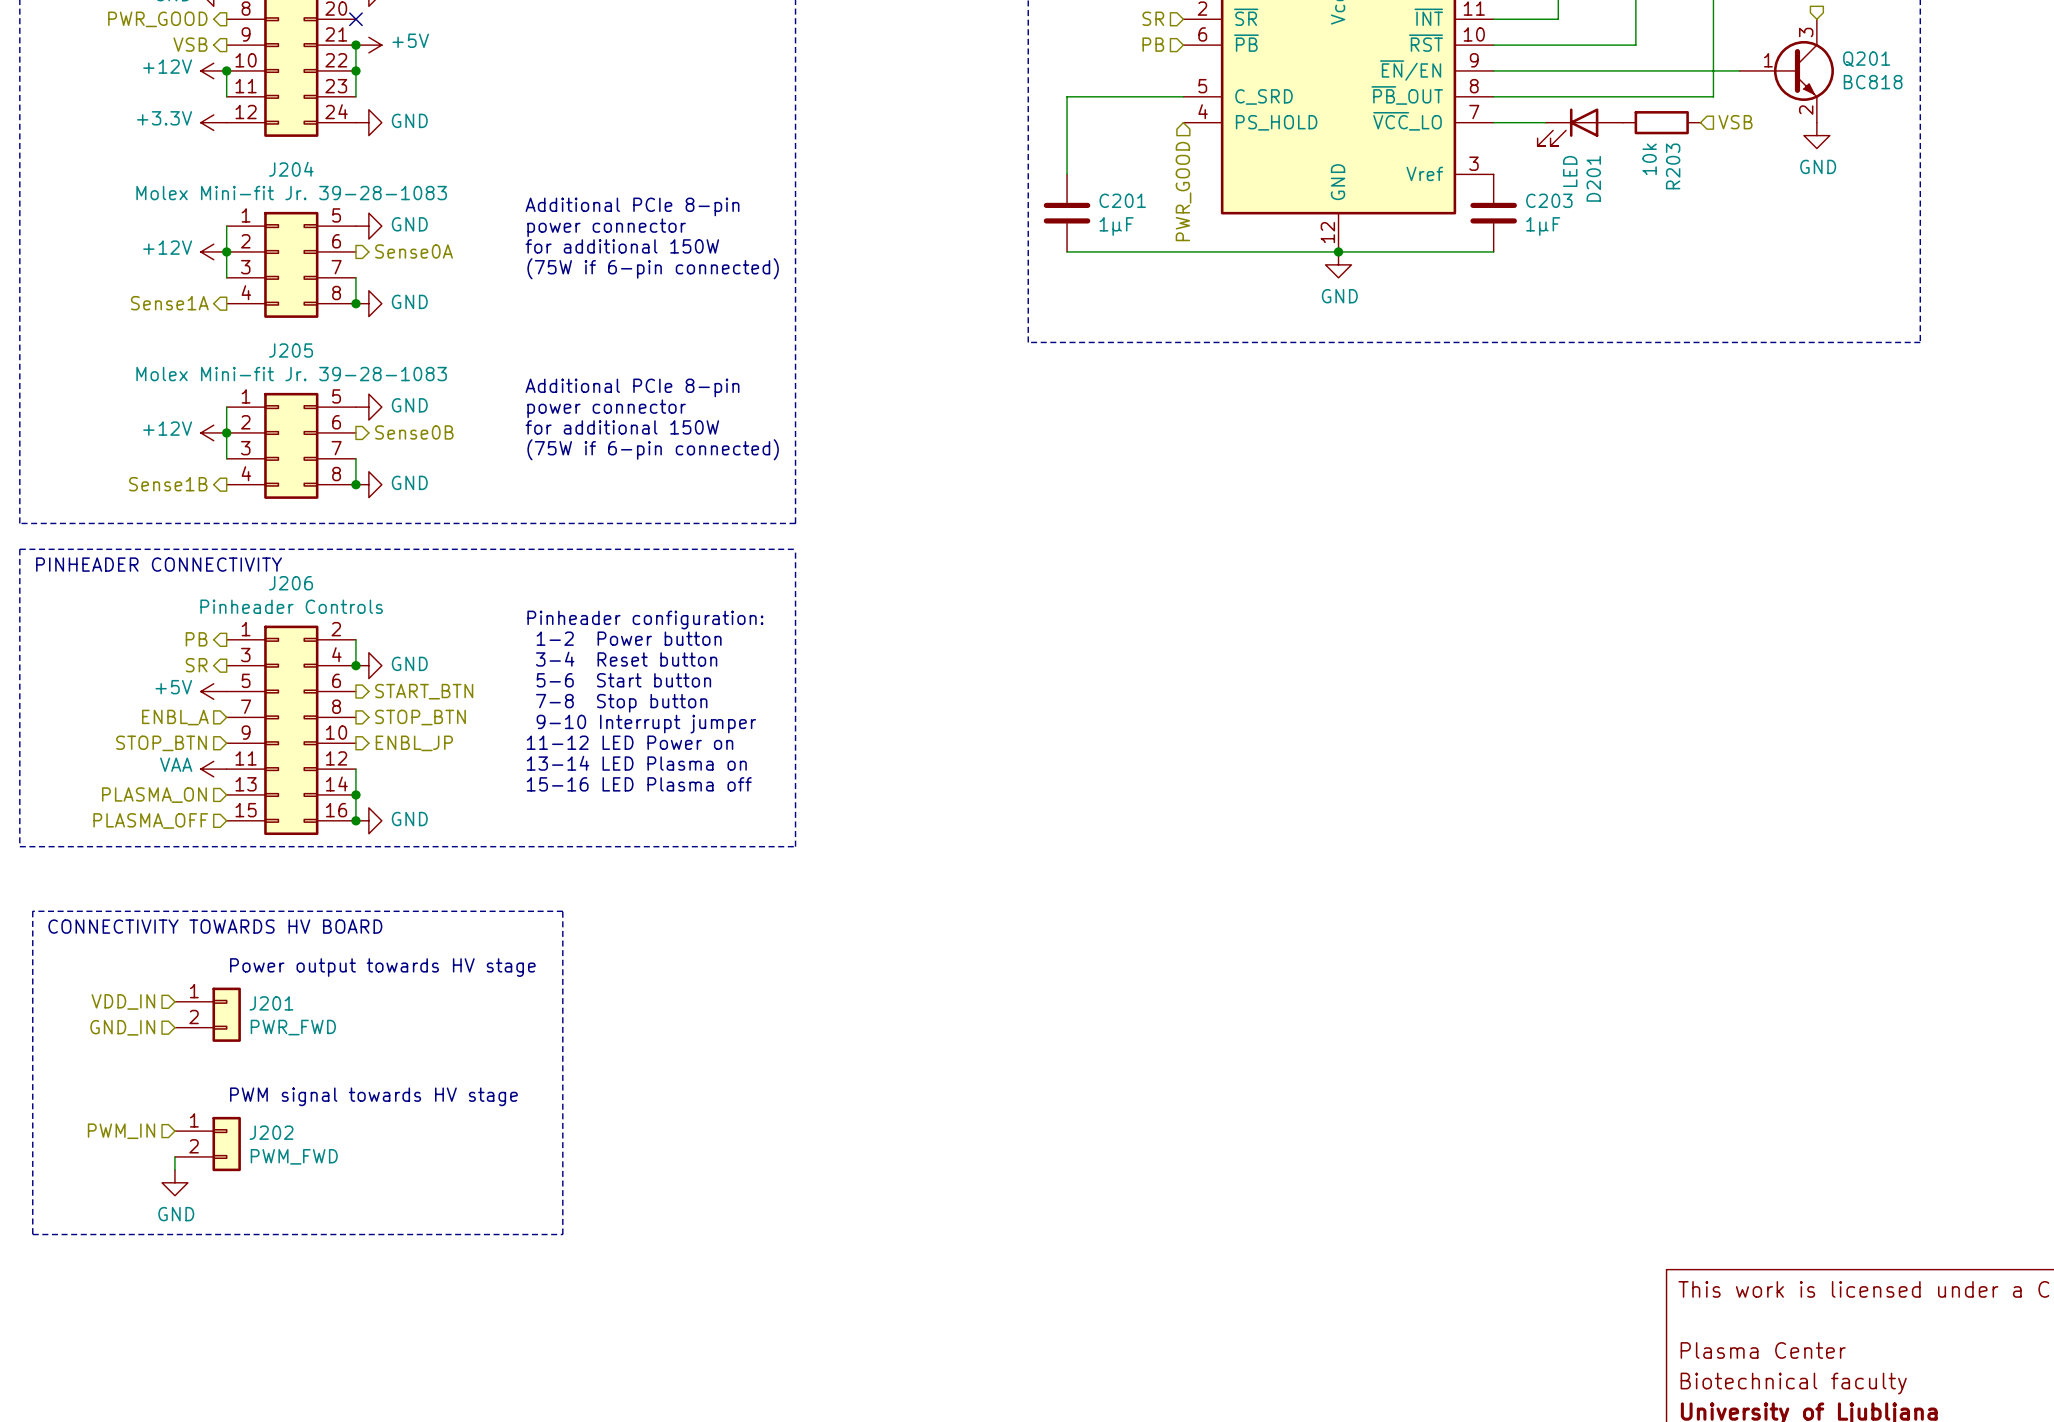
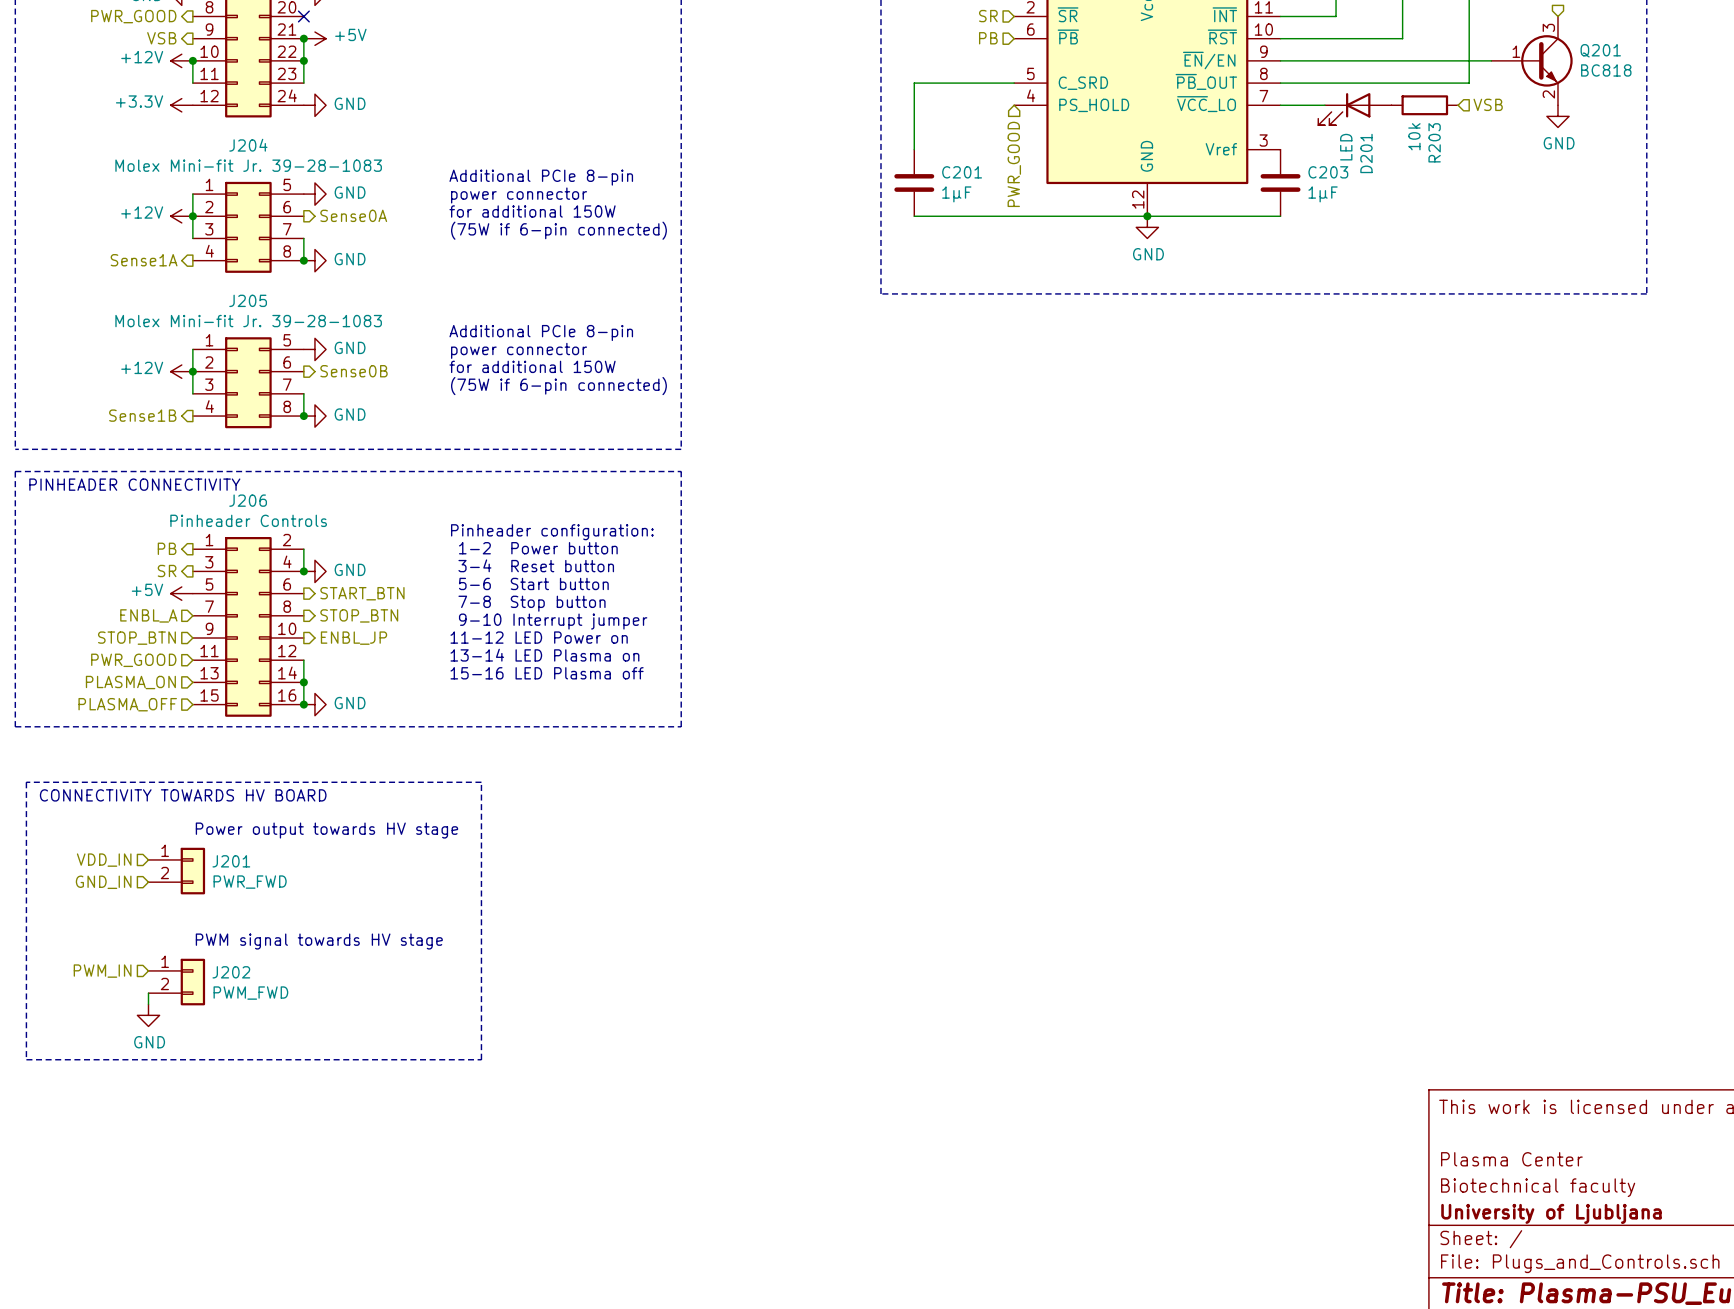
hierarchical label: none -> PWR_GOOD (133, 660)
power symbol: VAA (213, 769) -> none

